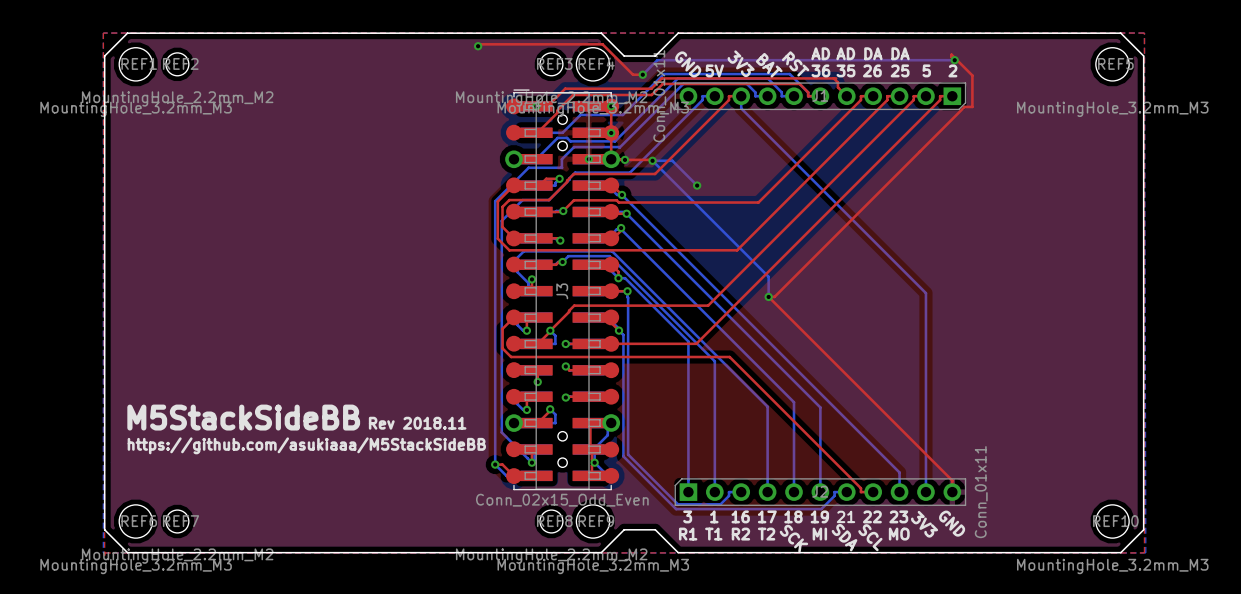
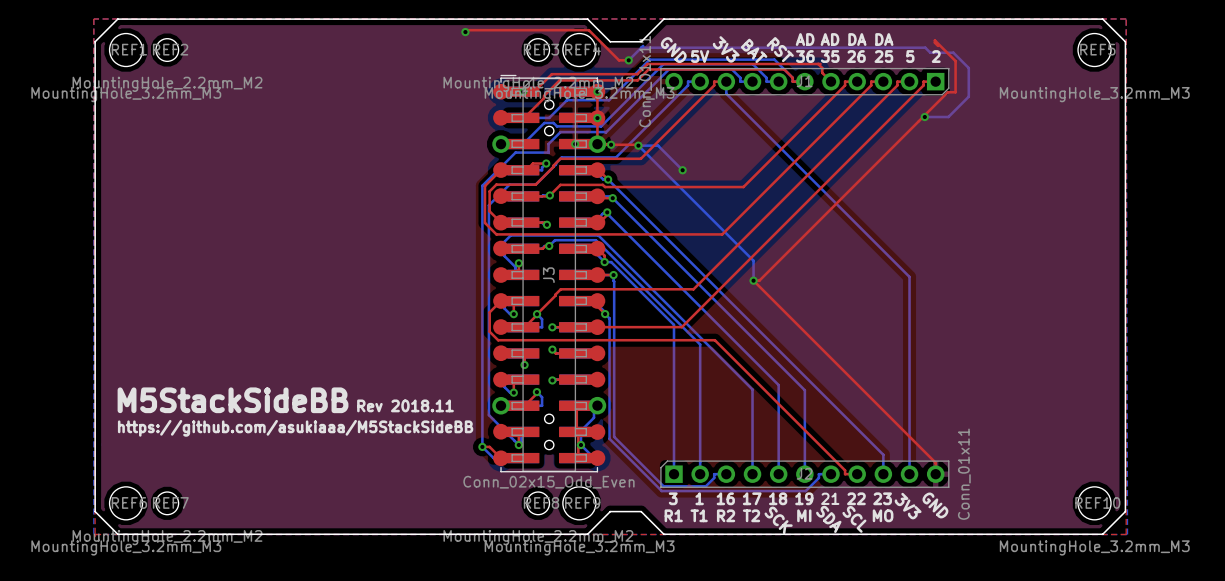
bottom track: (657, 60) (954, 60) -> none
via: (954, 60) -> none
bottom track: none -> (641, 47) (925, 47) (930, 52) (953, 52) (968, 68) (968, 96) (948, 117) (924, 117)
via: none -> (924, 117)

